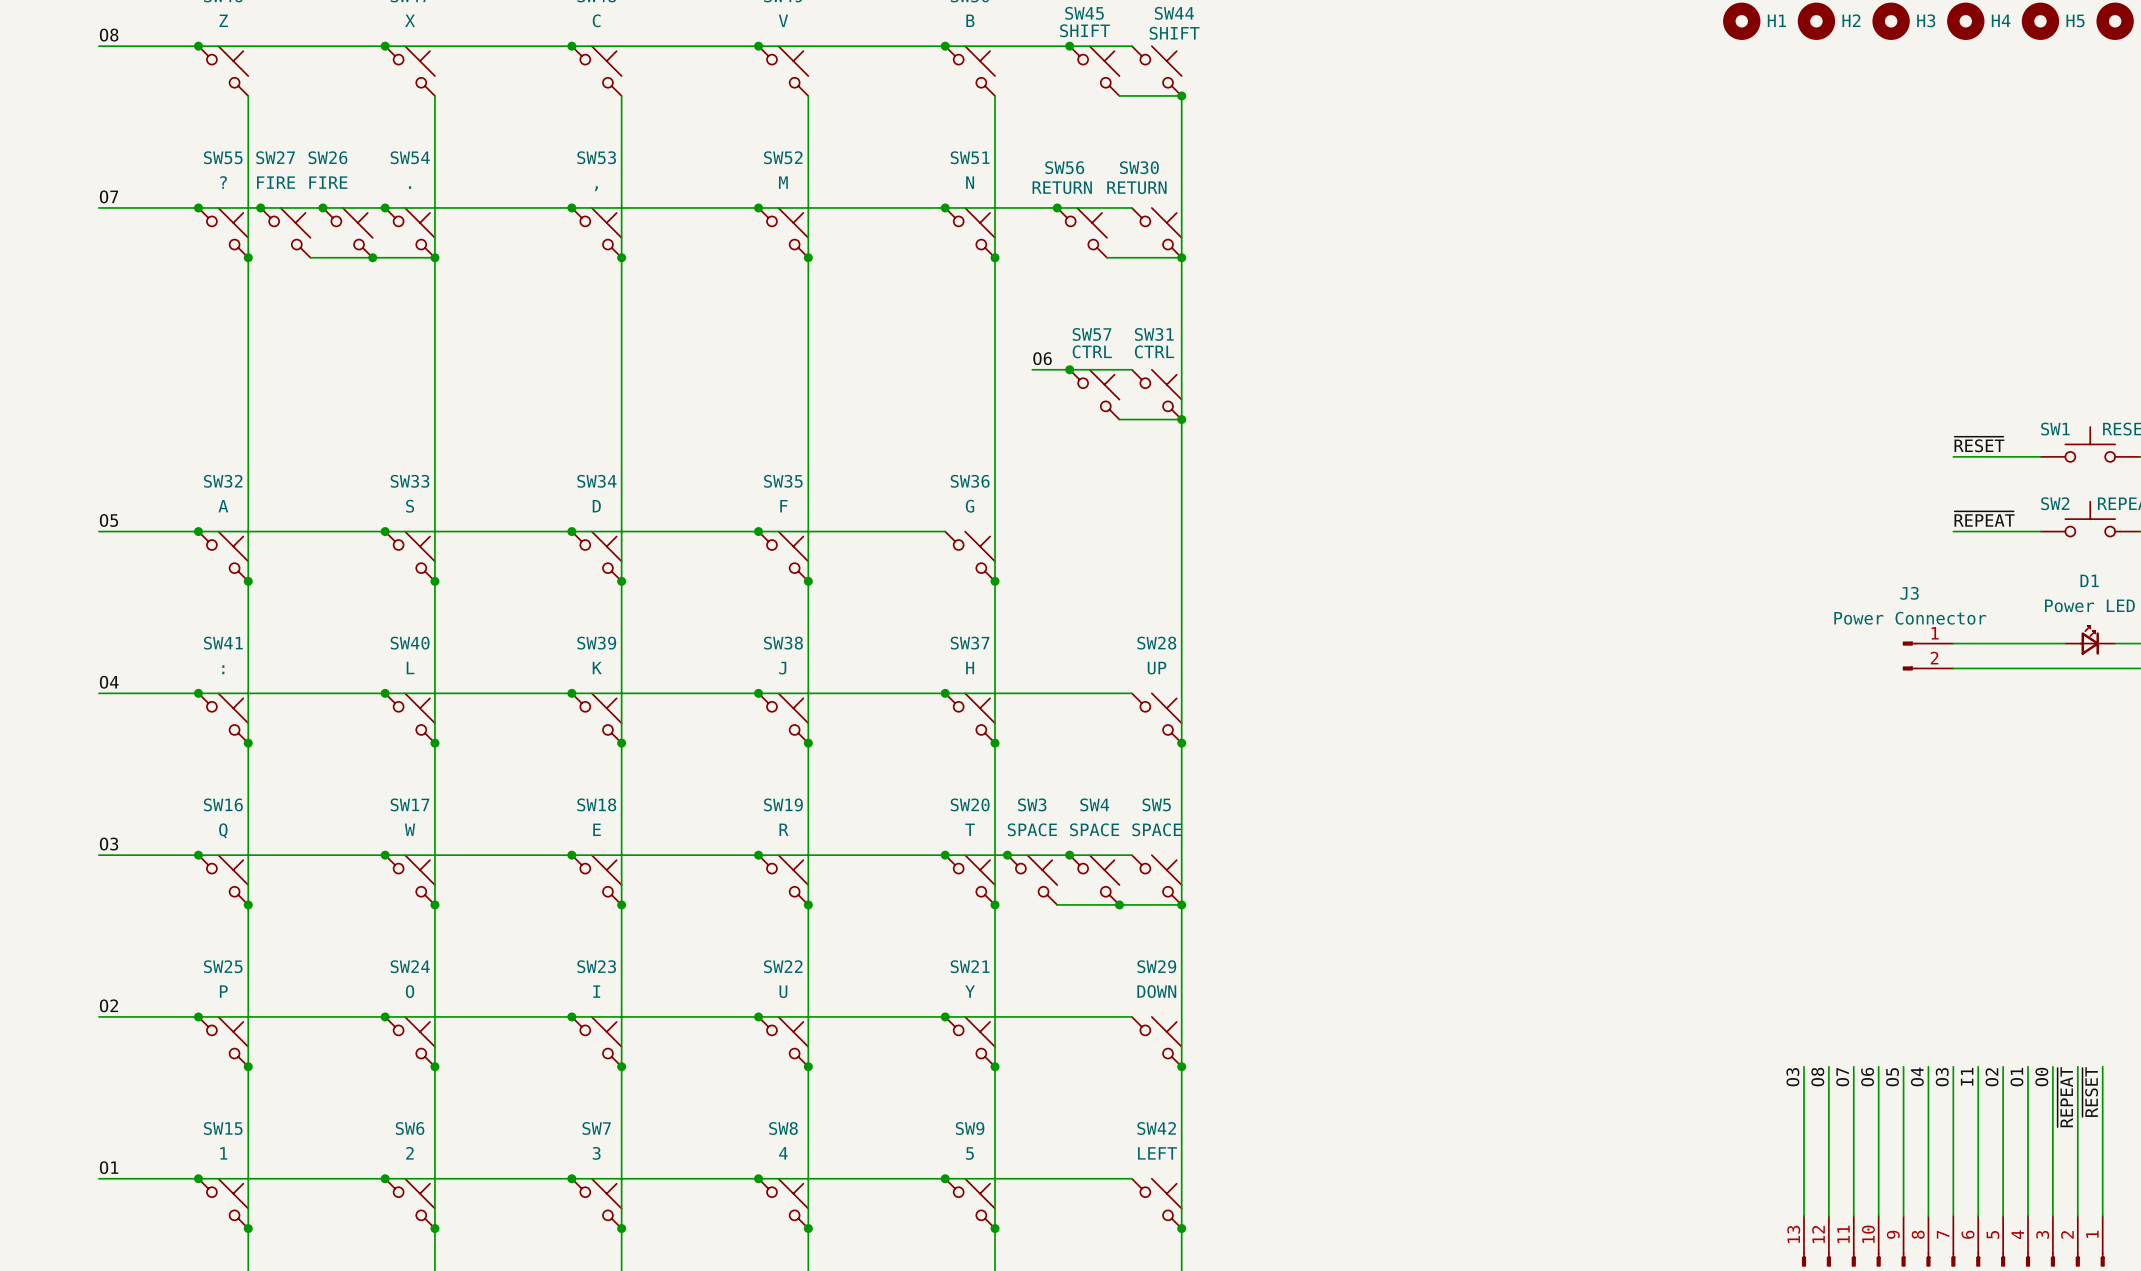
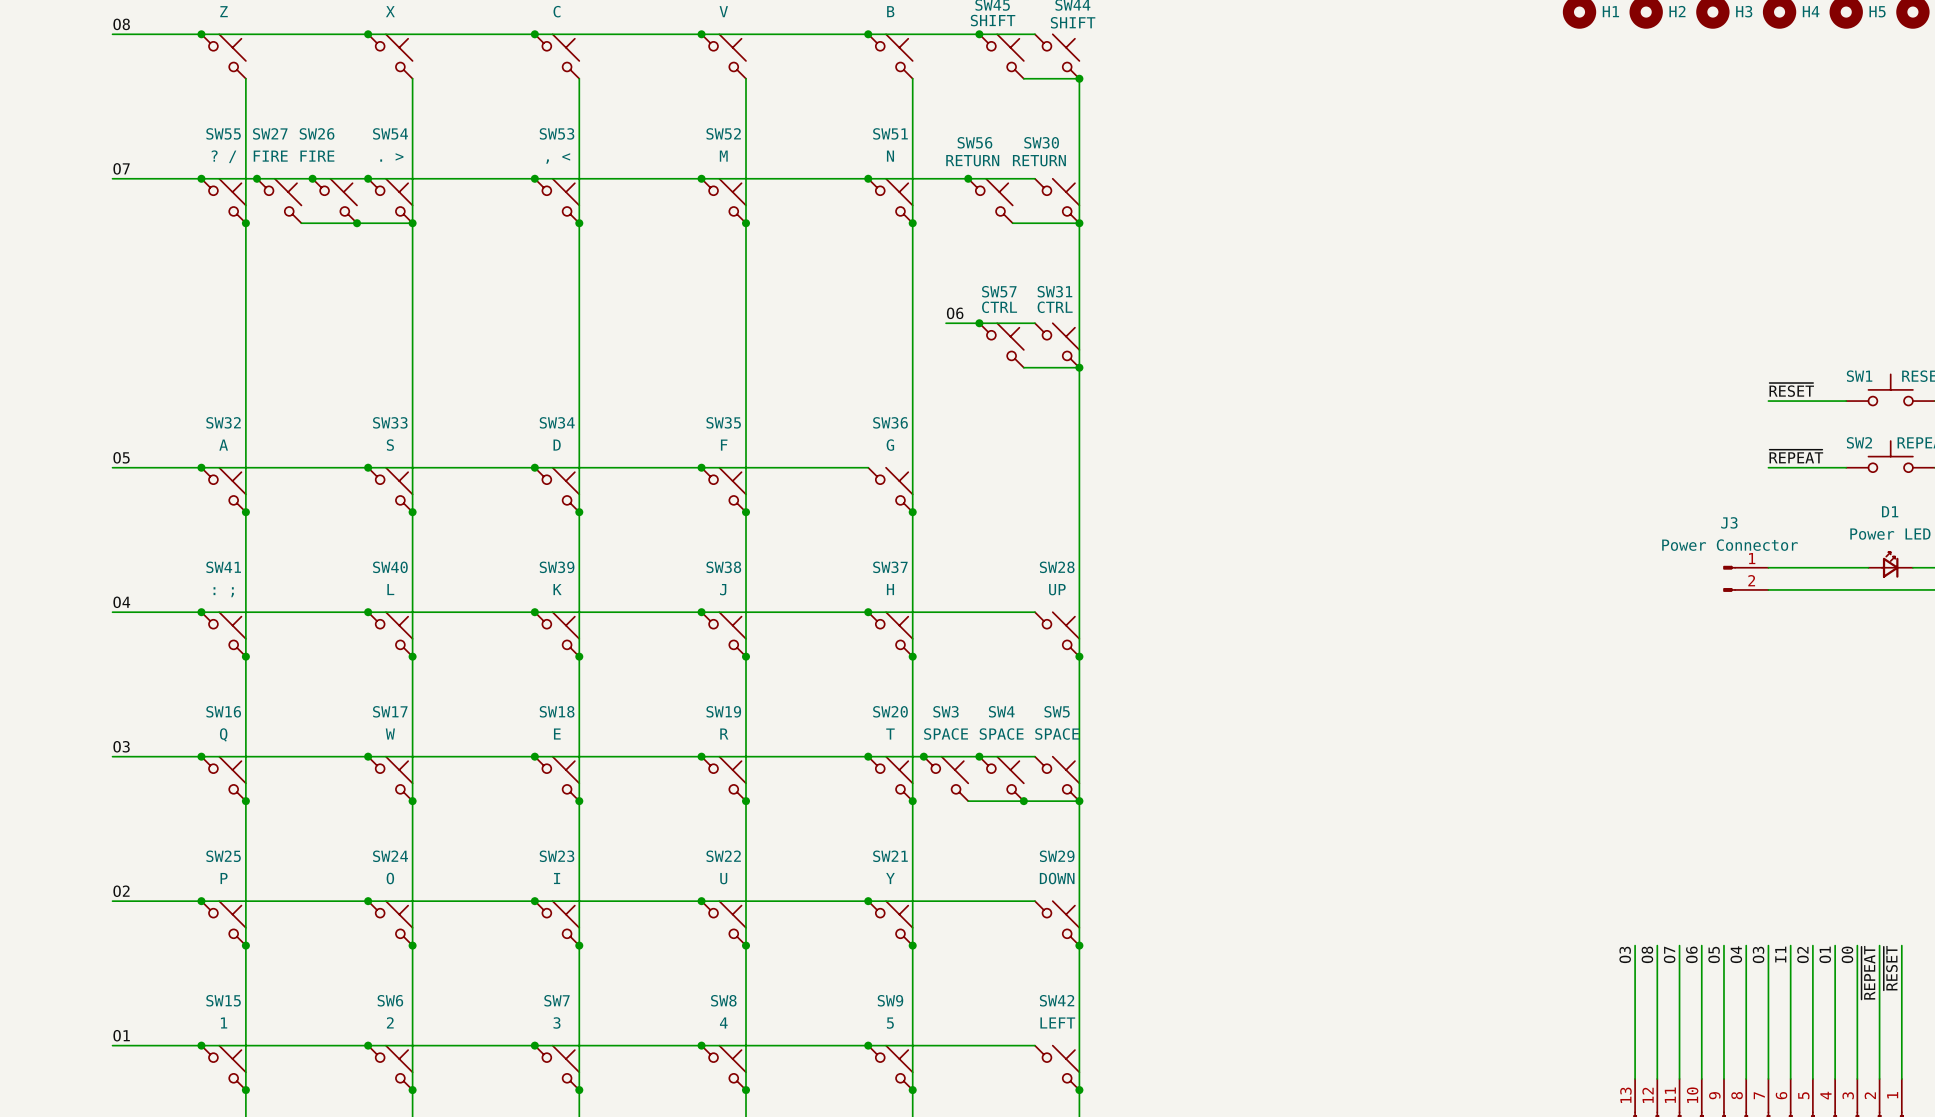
SW55 value: ? (223, 182) -> ? / (224, 156)
SW54 value: . (410, 187) -> . > (391, 157)
SW53 value: , (596, 188) -> , < (558, 158)
SW41 value: : (223, 669) -> : ; (223, 592)

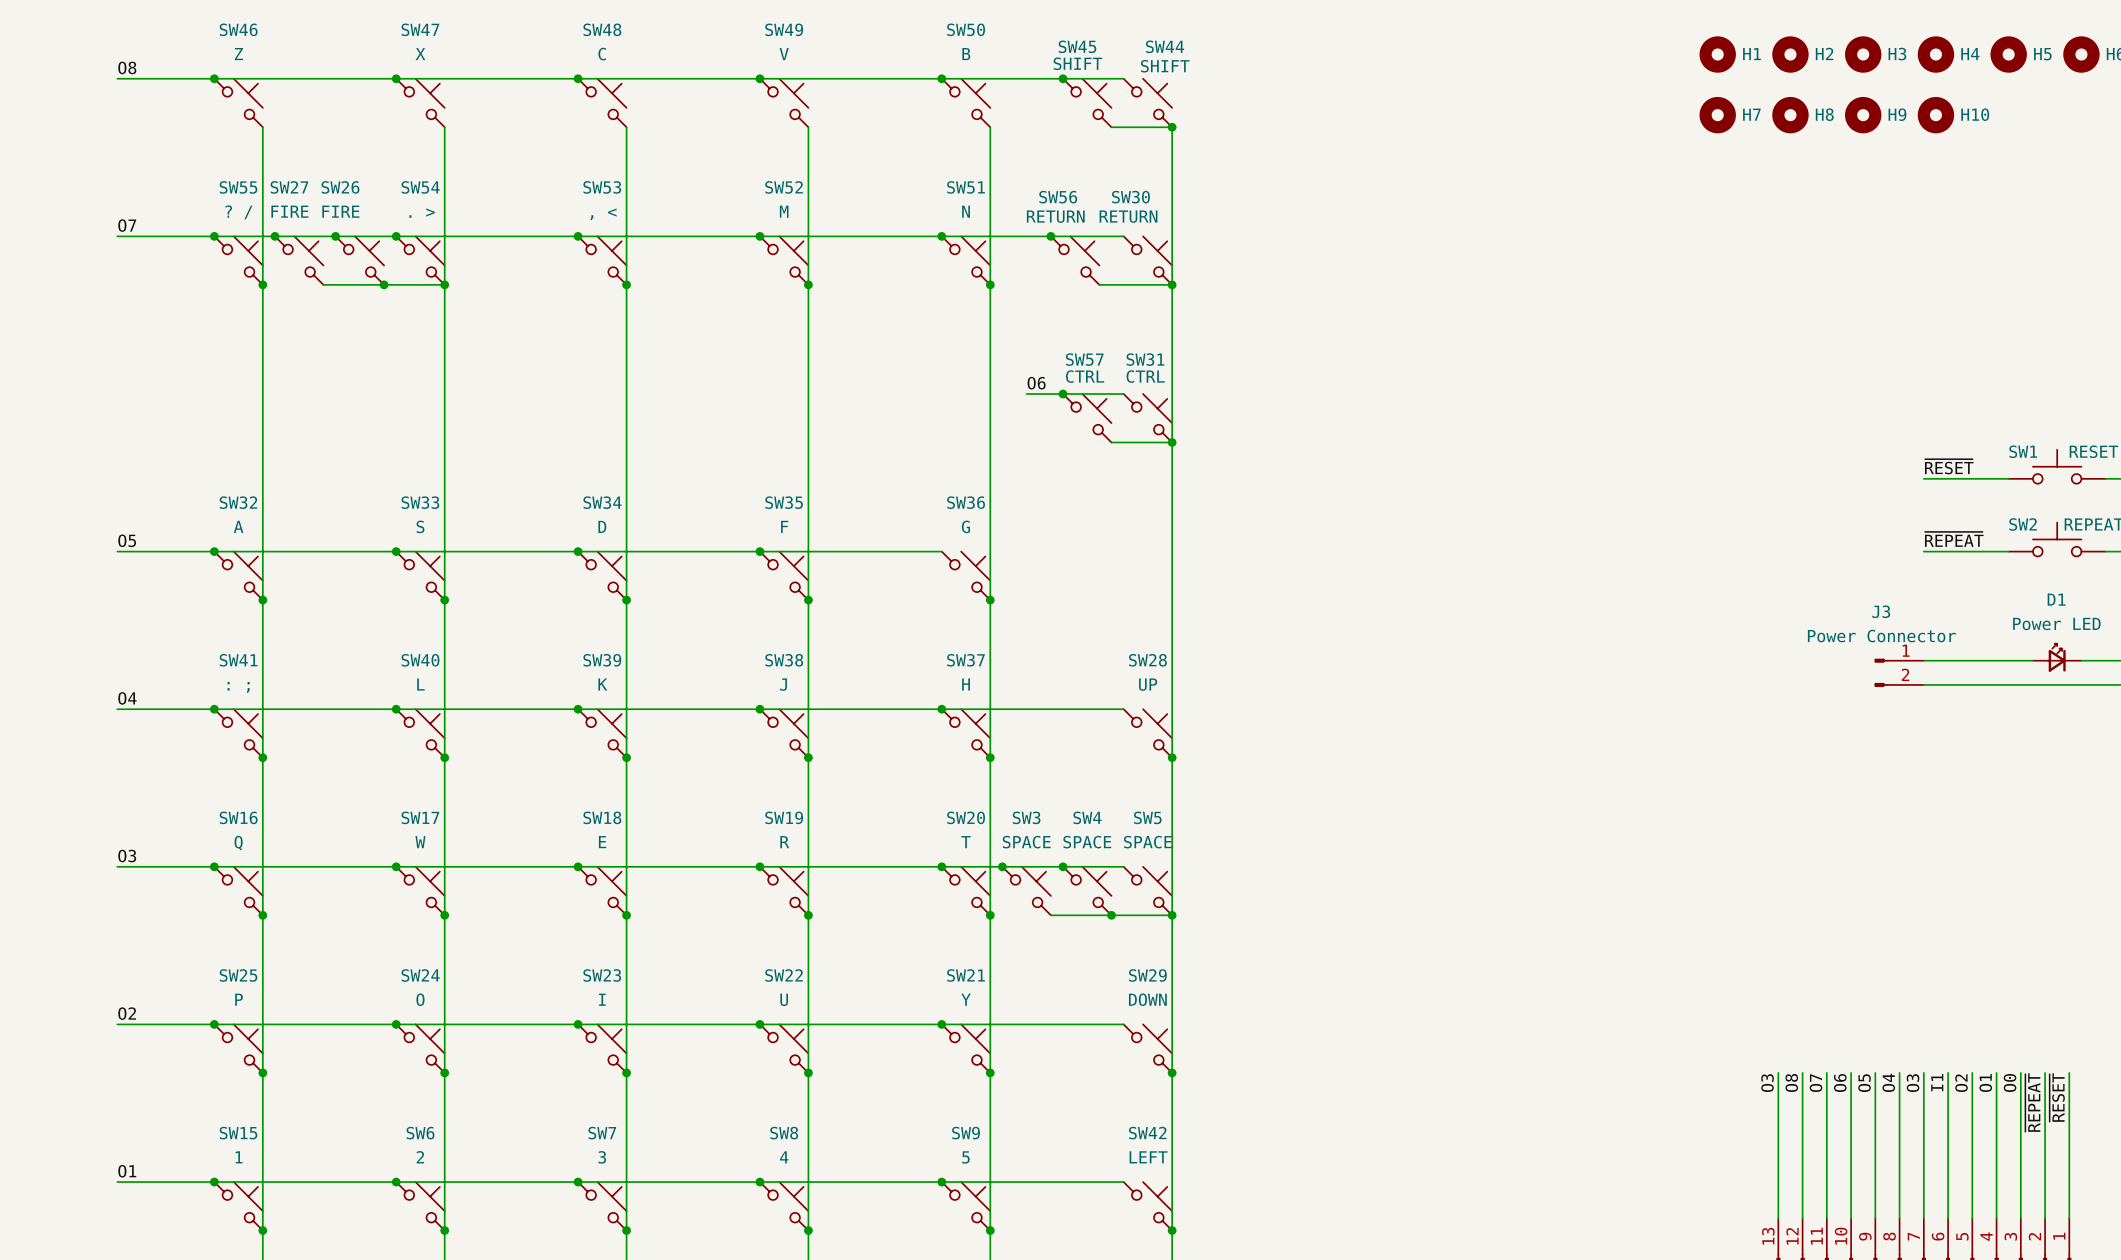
H7: none -> (1717, 115)
H8: none -> (1790, 115)
H9: none -> (1863, 115)
H10: none -> (1935, 115)

